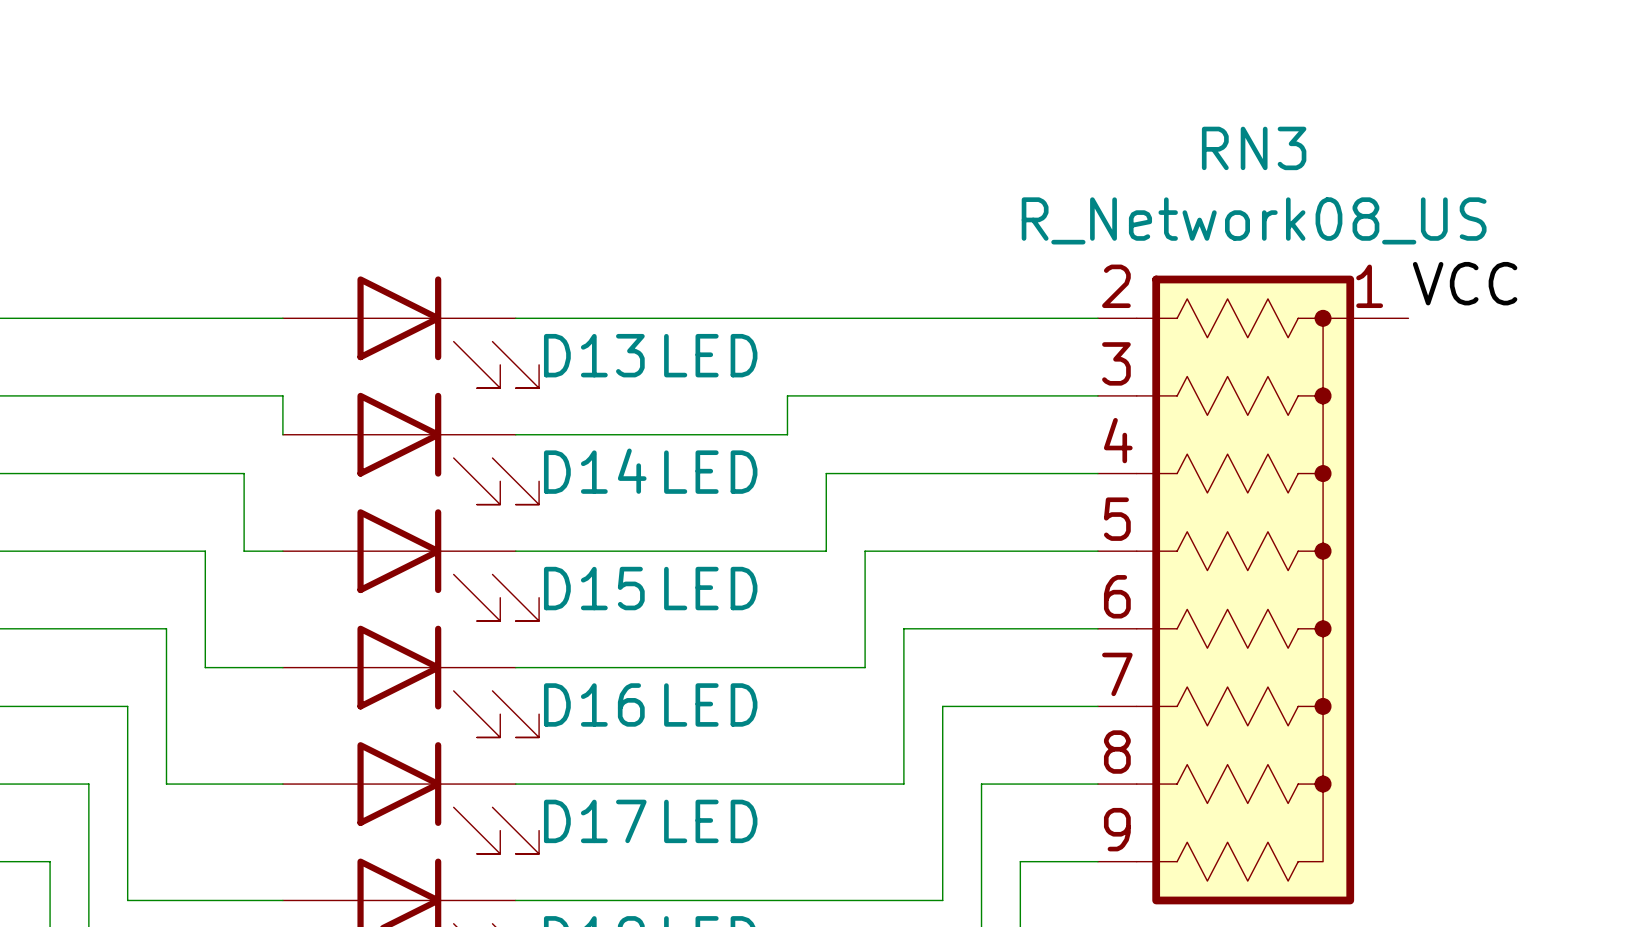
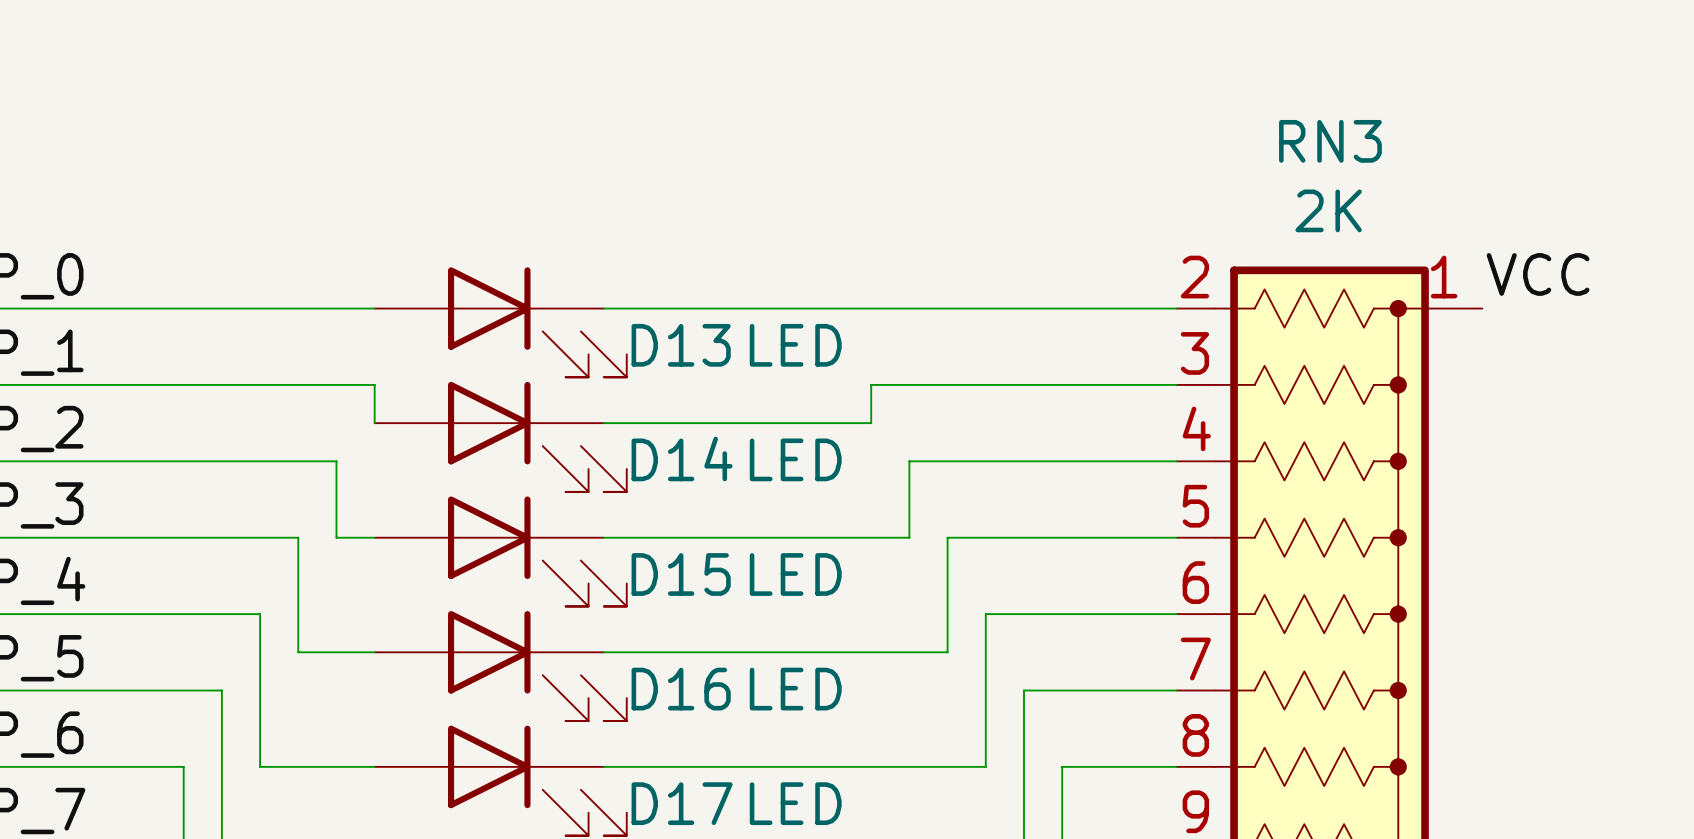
RN3 value: R_Network08_US (1254, 220) -> 2K (1328, 210)

